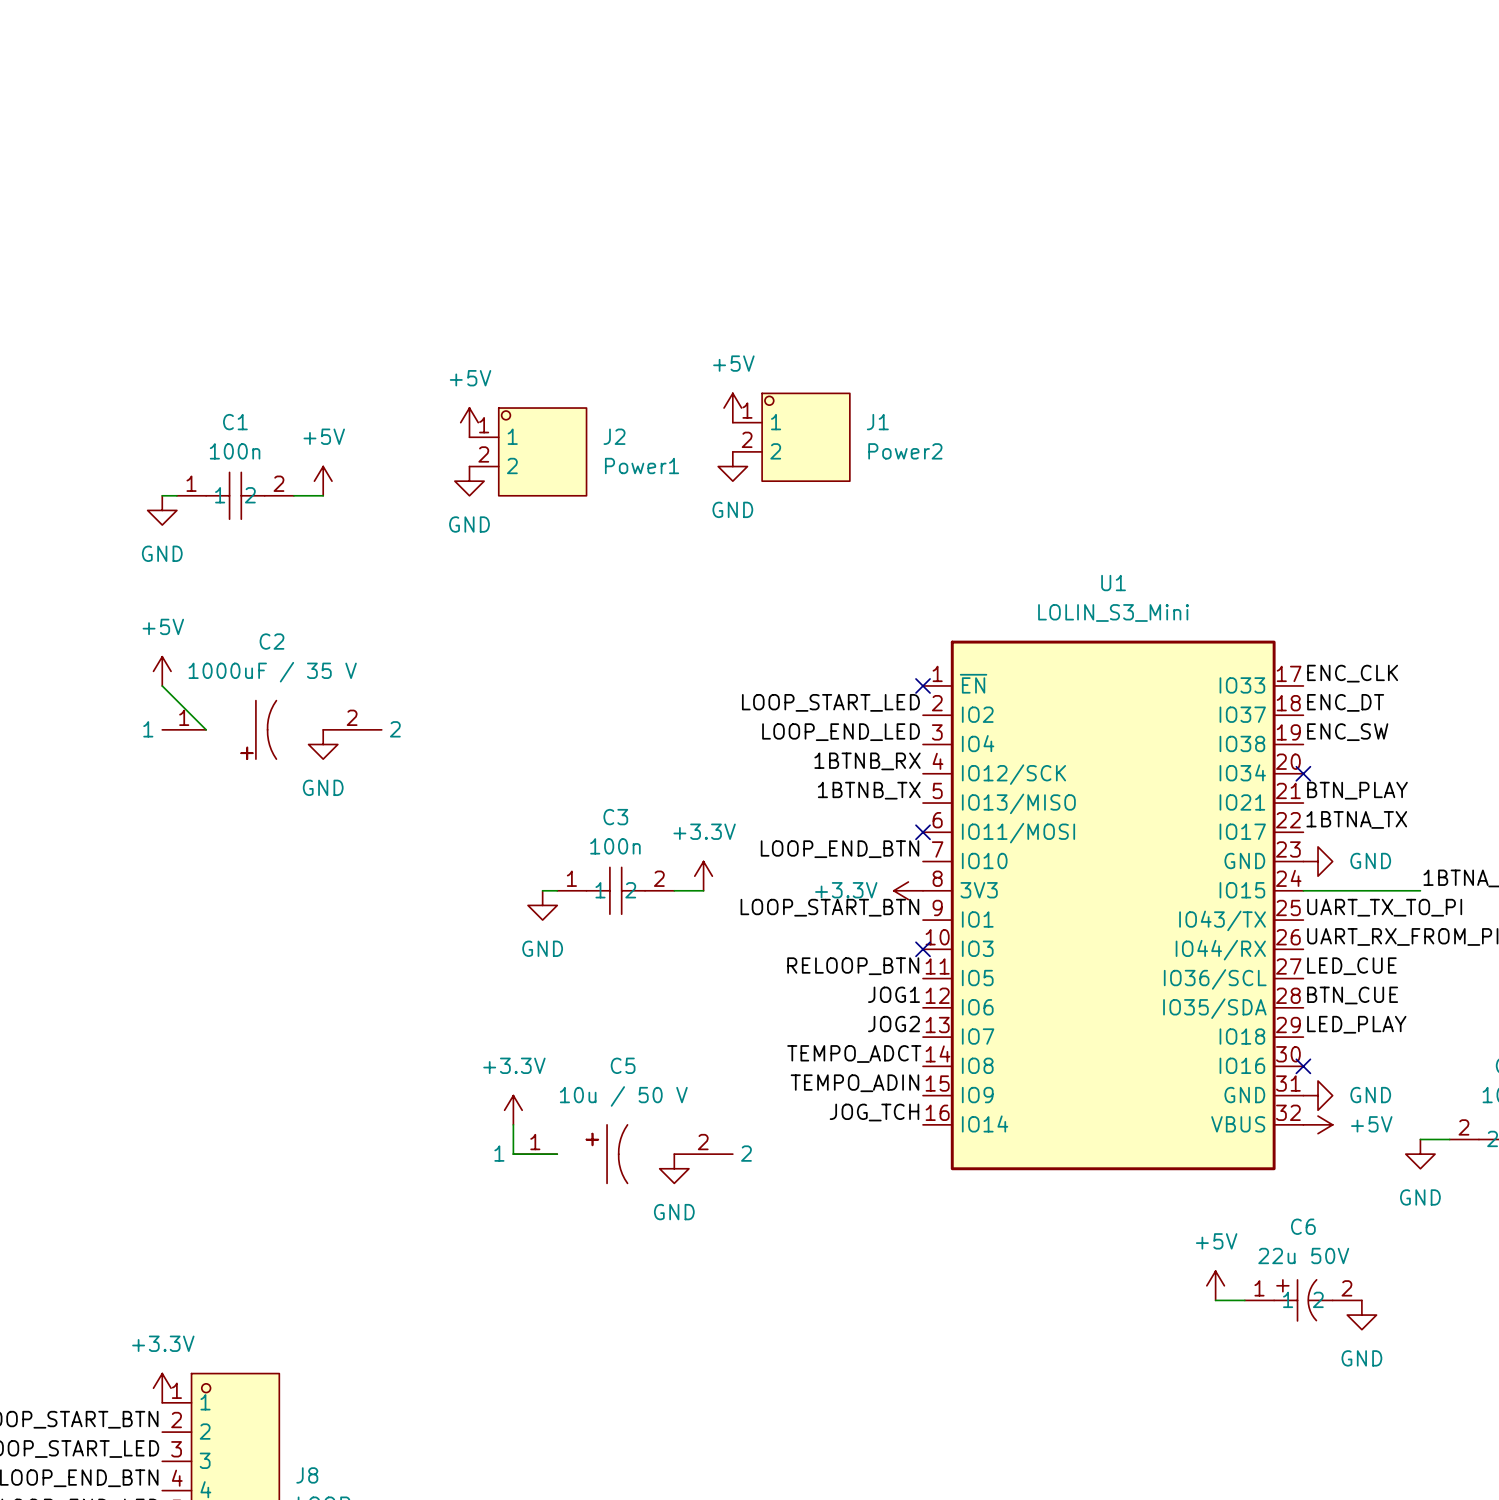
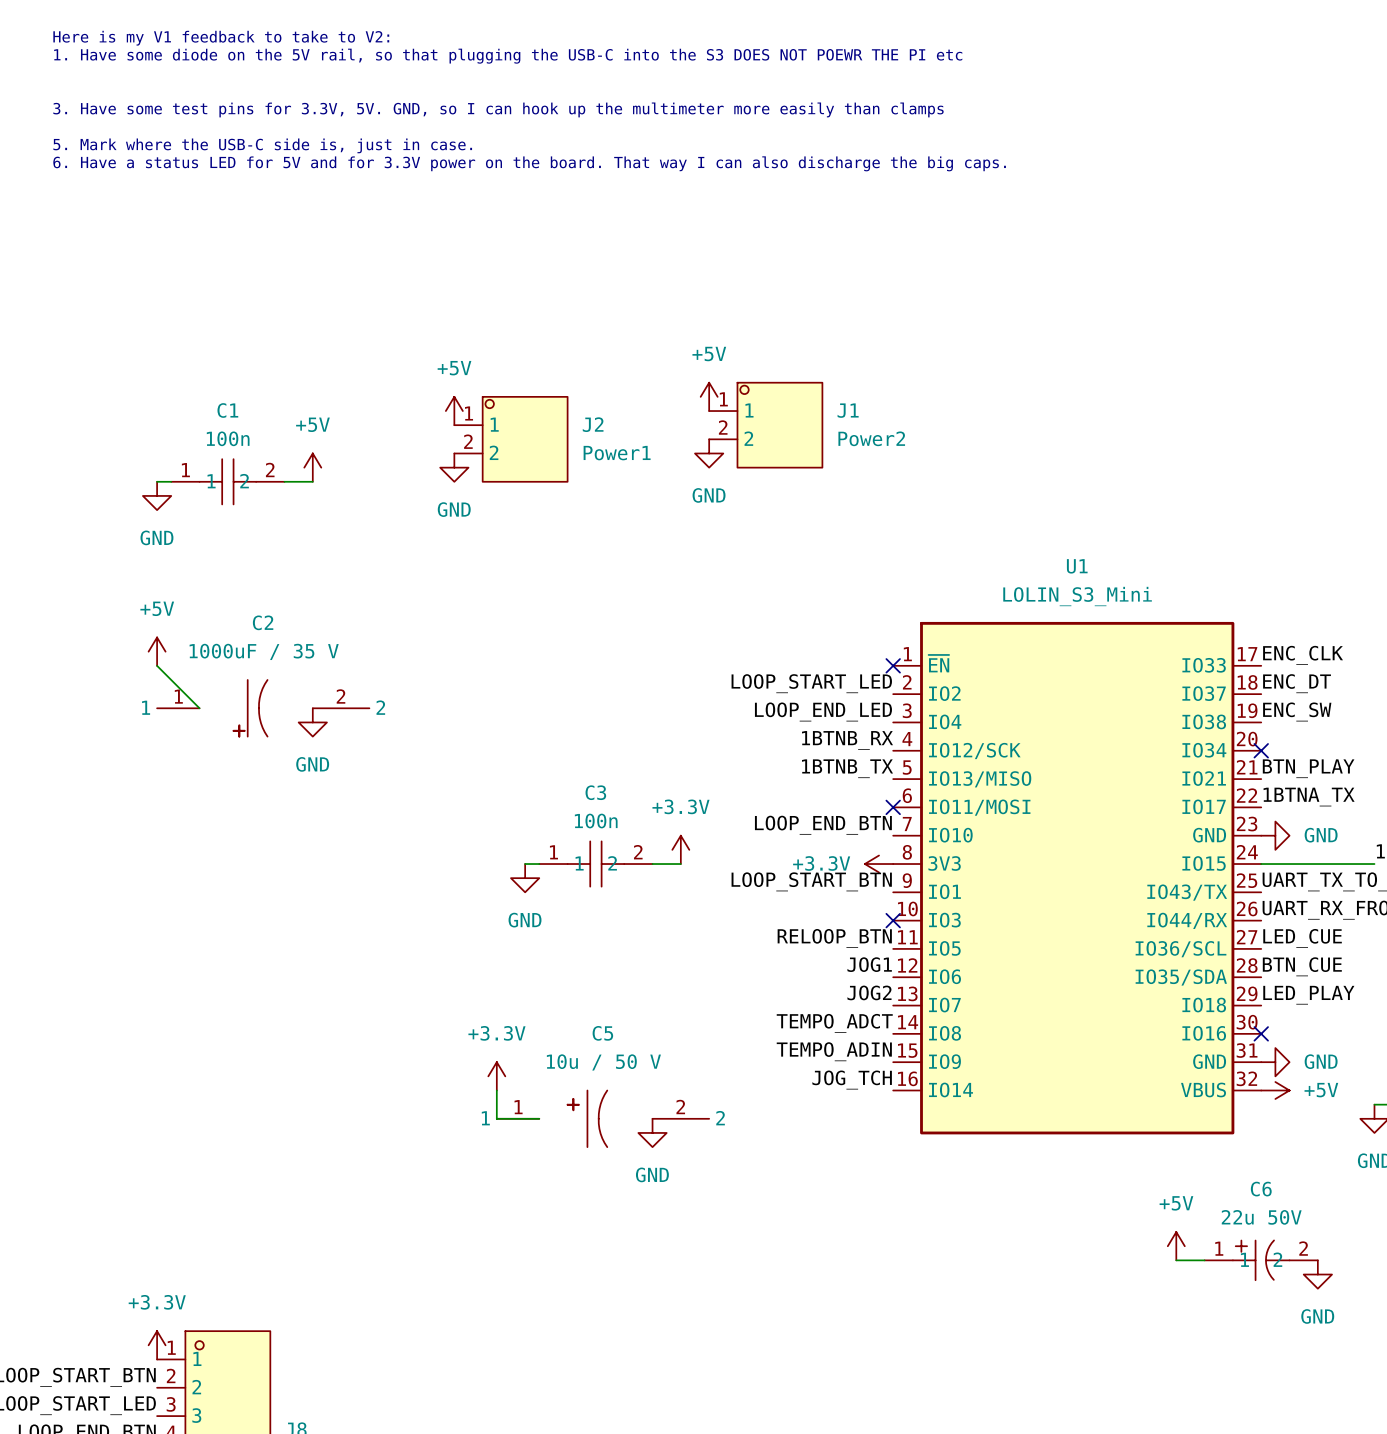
text: none -> Here is my V1 feedback to take to V2: (221, 38)
text: none -> 1. Have some diode on the 5V rail, so that plugging the USB-C into the S3 DOES NOT POEWR THE PI etc (508, 56)
text: none -> 3. Have some test pins for 3.3V, 5V. GND, so I can hook up the multimeter more easily than clamps (498, 109)
text: none -> 5. Mark where the USB-C side is, just in case. (262, 145)
text: none -> 6. Have a status LED for 5V and for 3.3V power on the board. That way I can also discharge the big caps. (529, 163)

